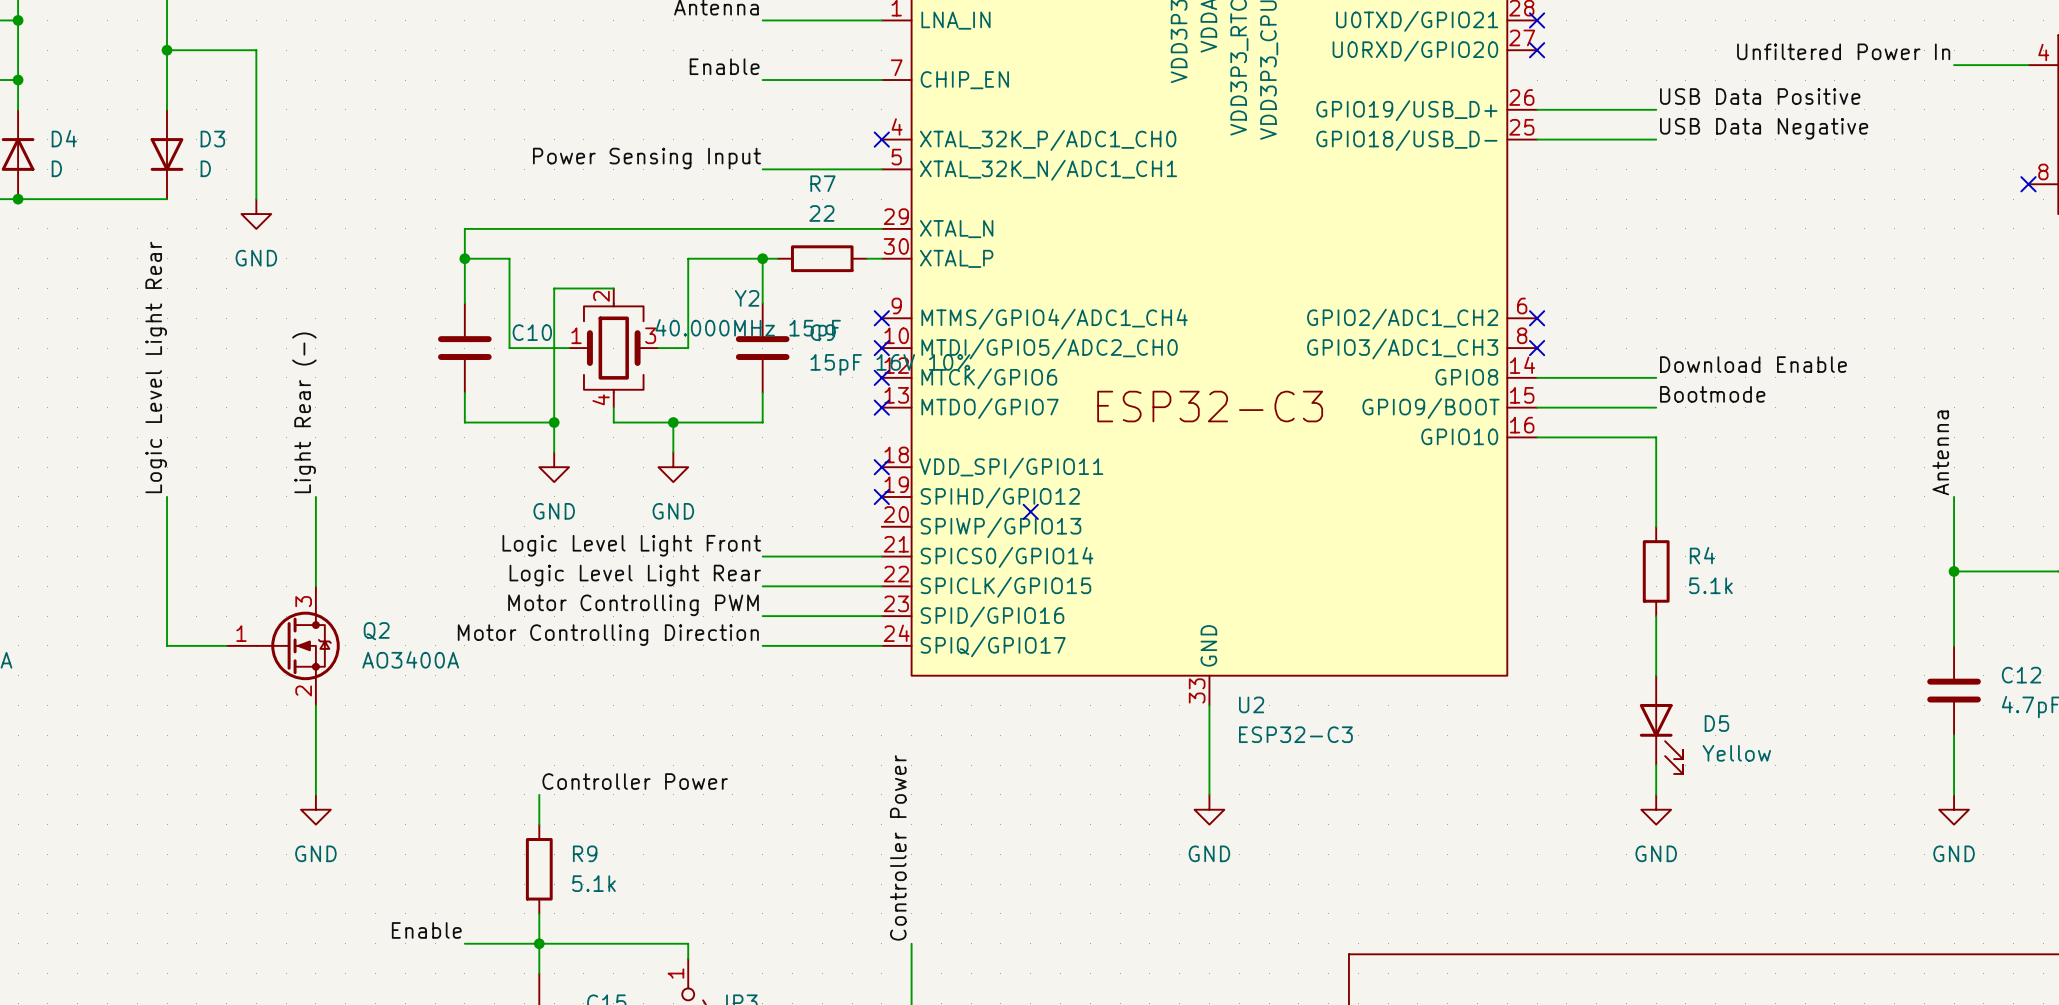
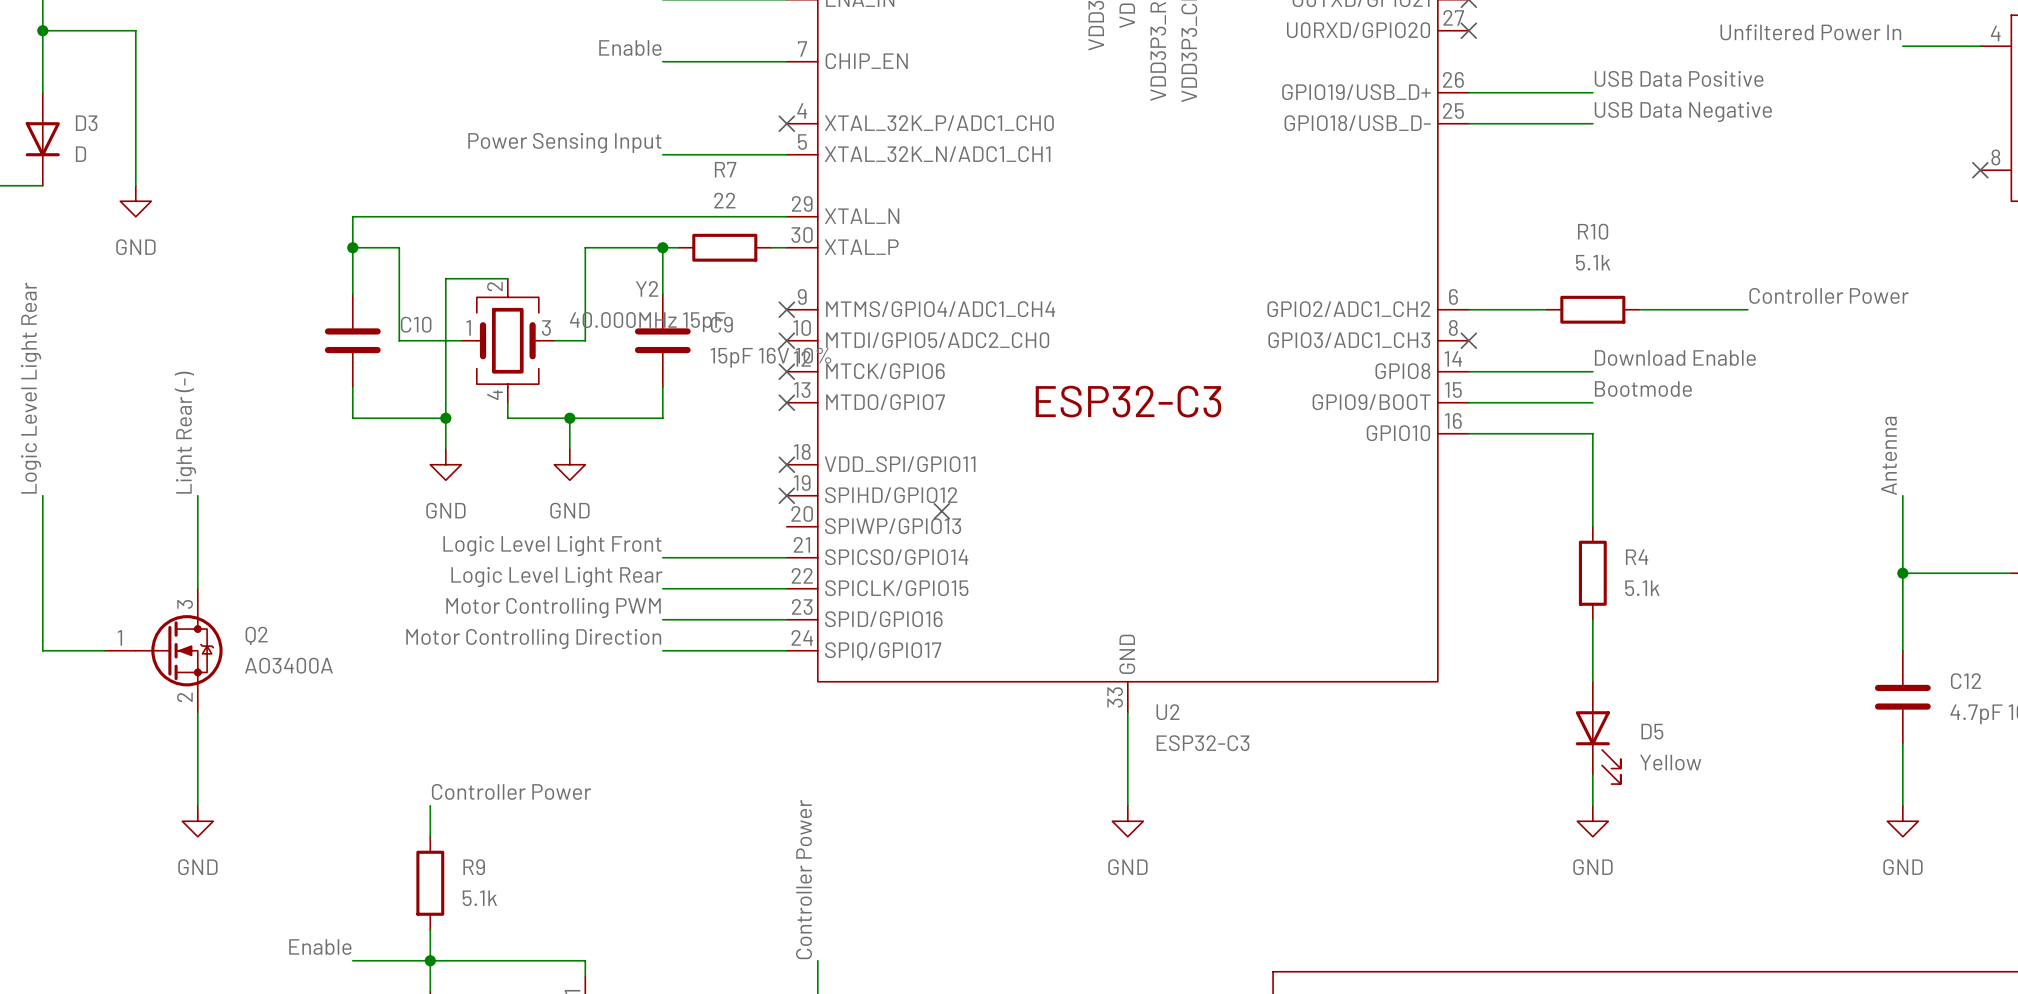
label: none -> Controller Power (1829, 295)
wire: none -> (1468, 309) (1546, 309)
no-connect mark: (1537, 318) -> none
R10: none -> 5.1k (1592, 309)
wire: none -> (1639, 309) (1747, 309)

